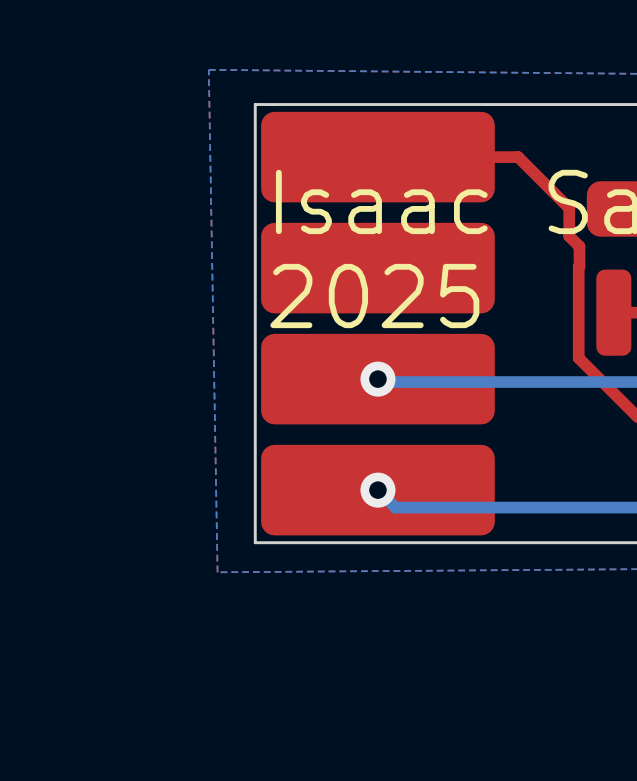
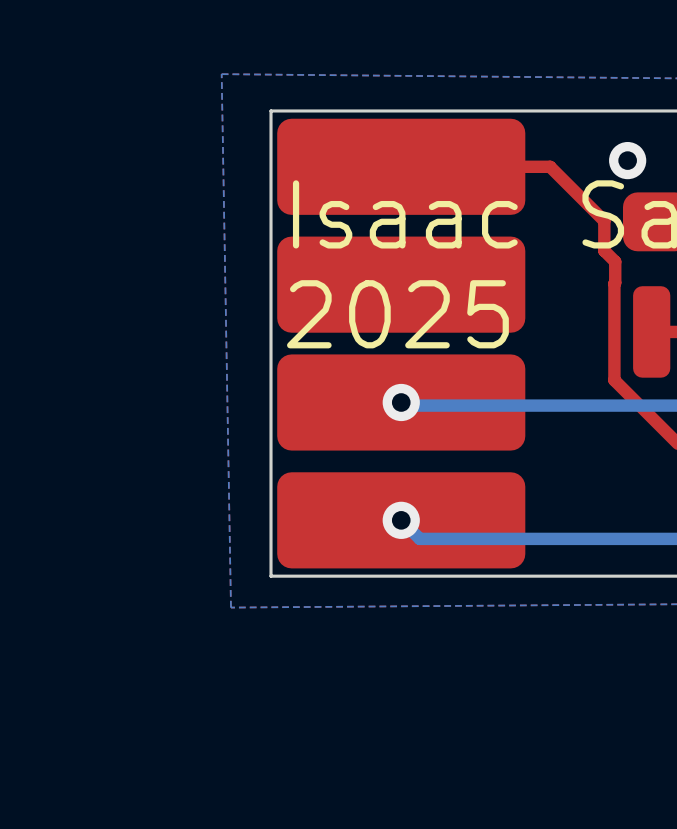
via: none -> (627, 160)

